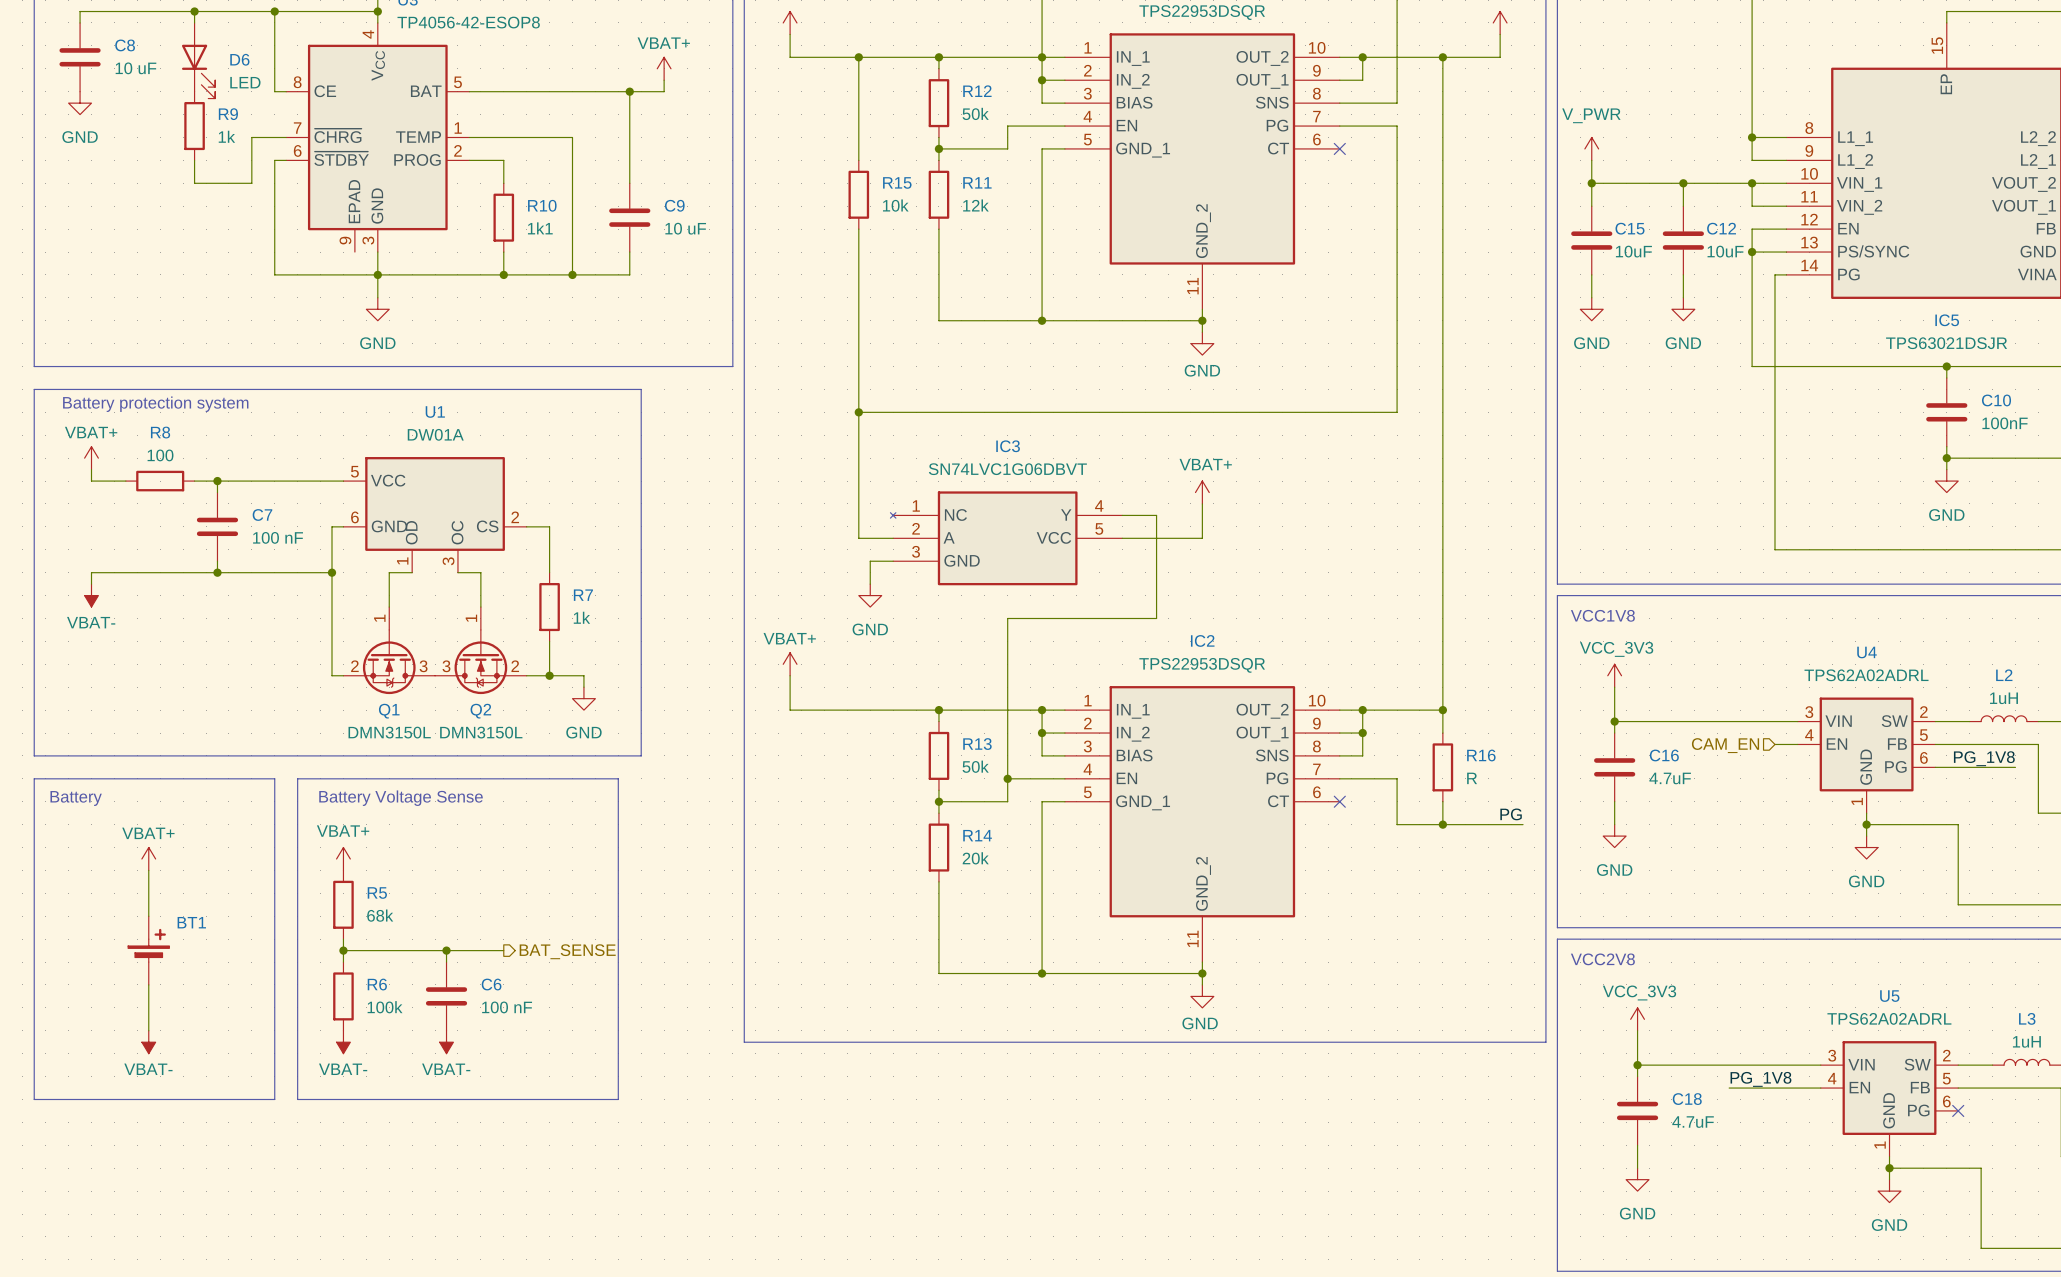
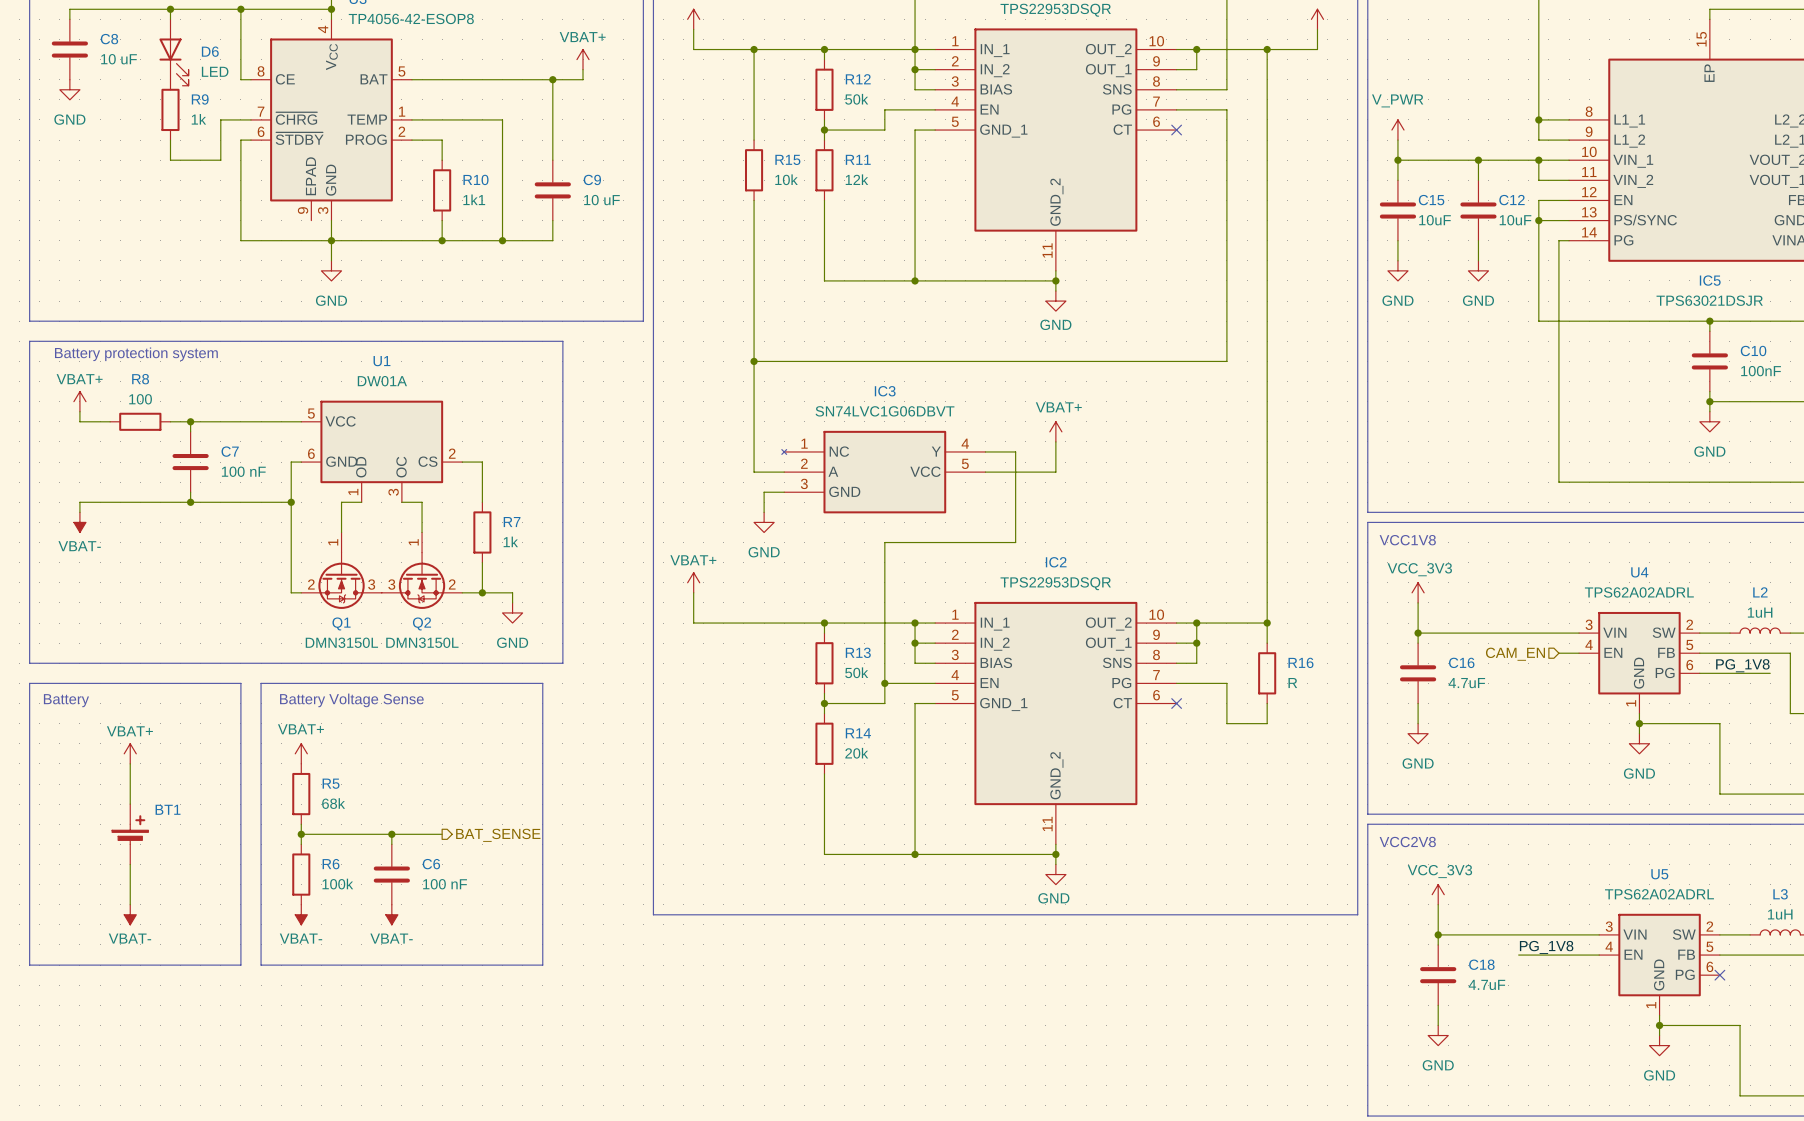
label: PG (1511, 814) -> none
wire: (1442, 824) (1523, 824) -> none
junction: (1442, 824) -> none

